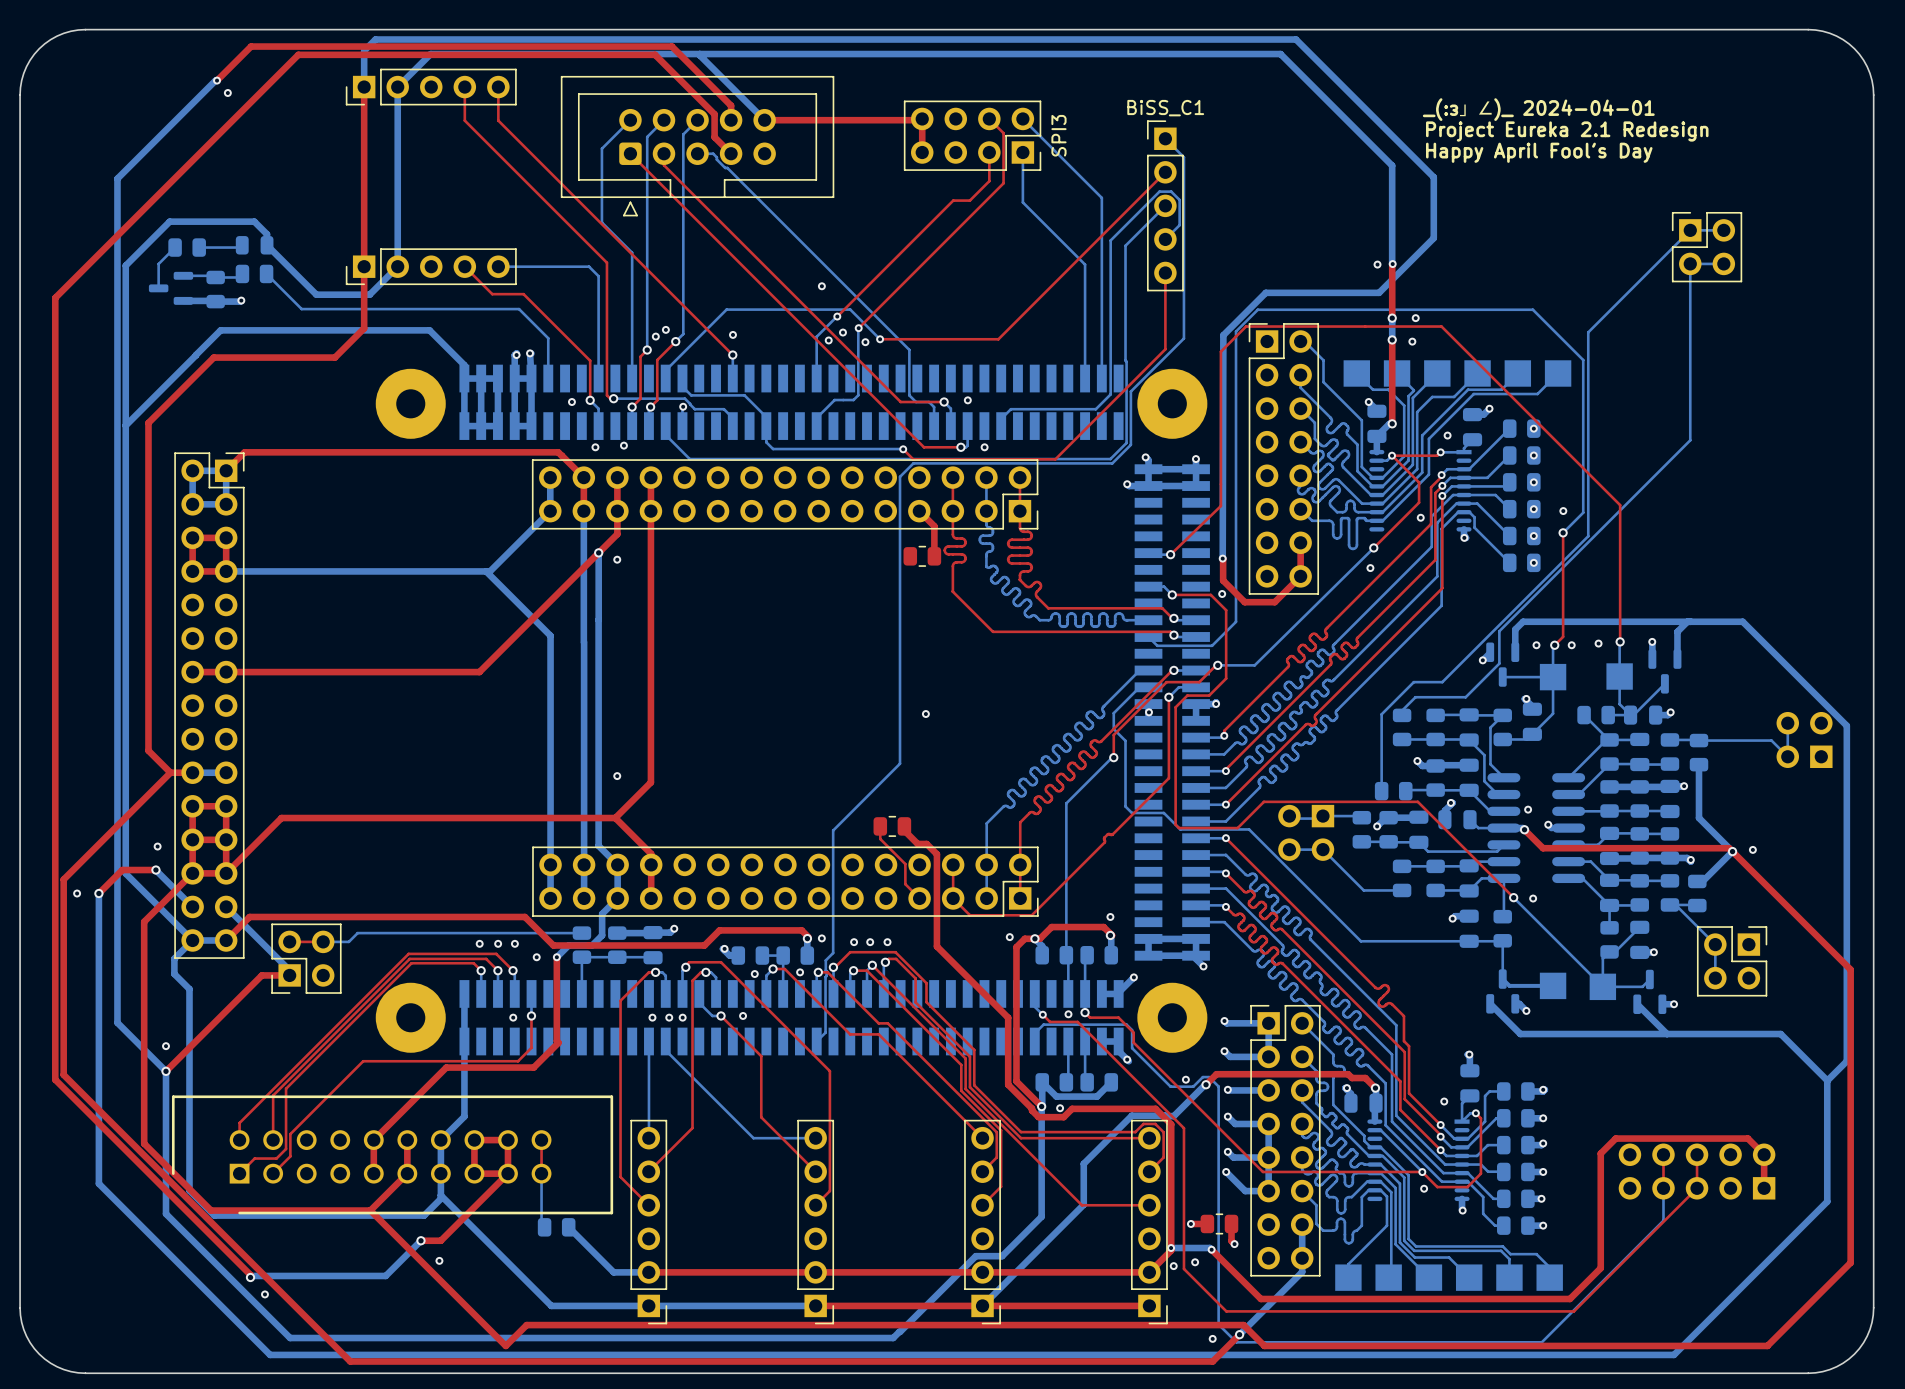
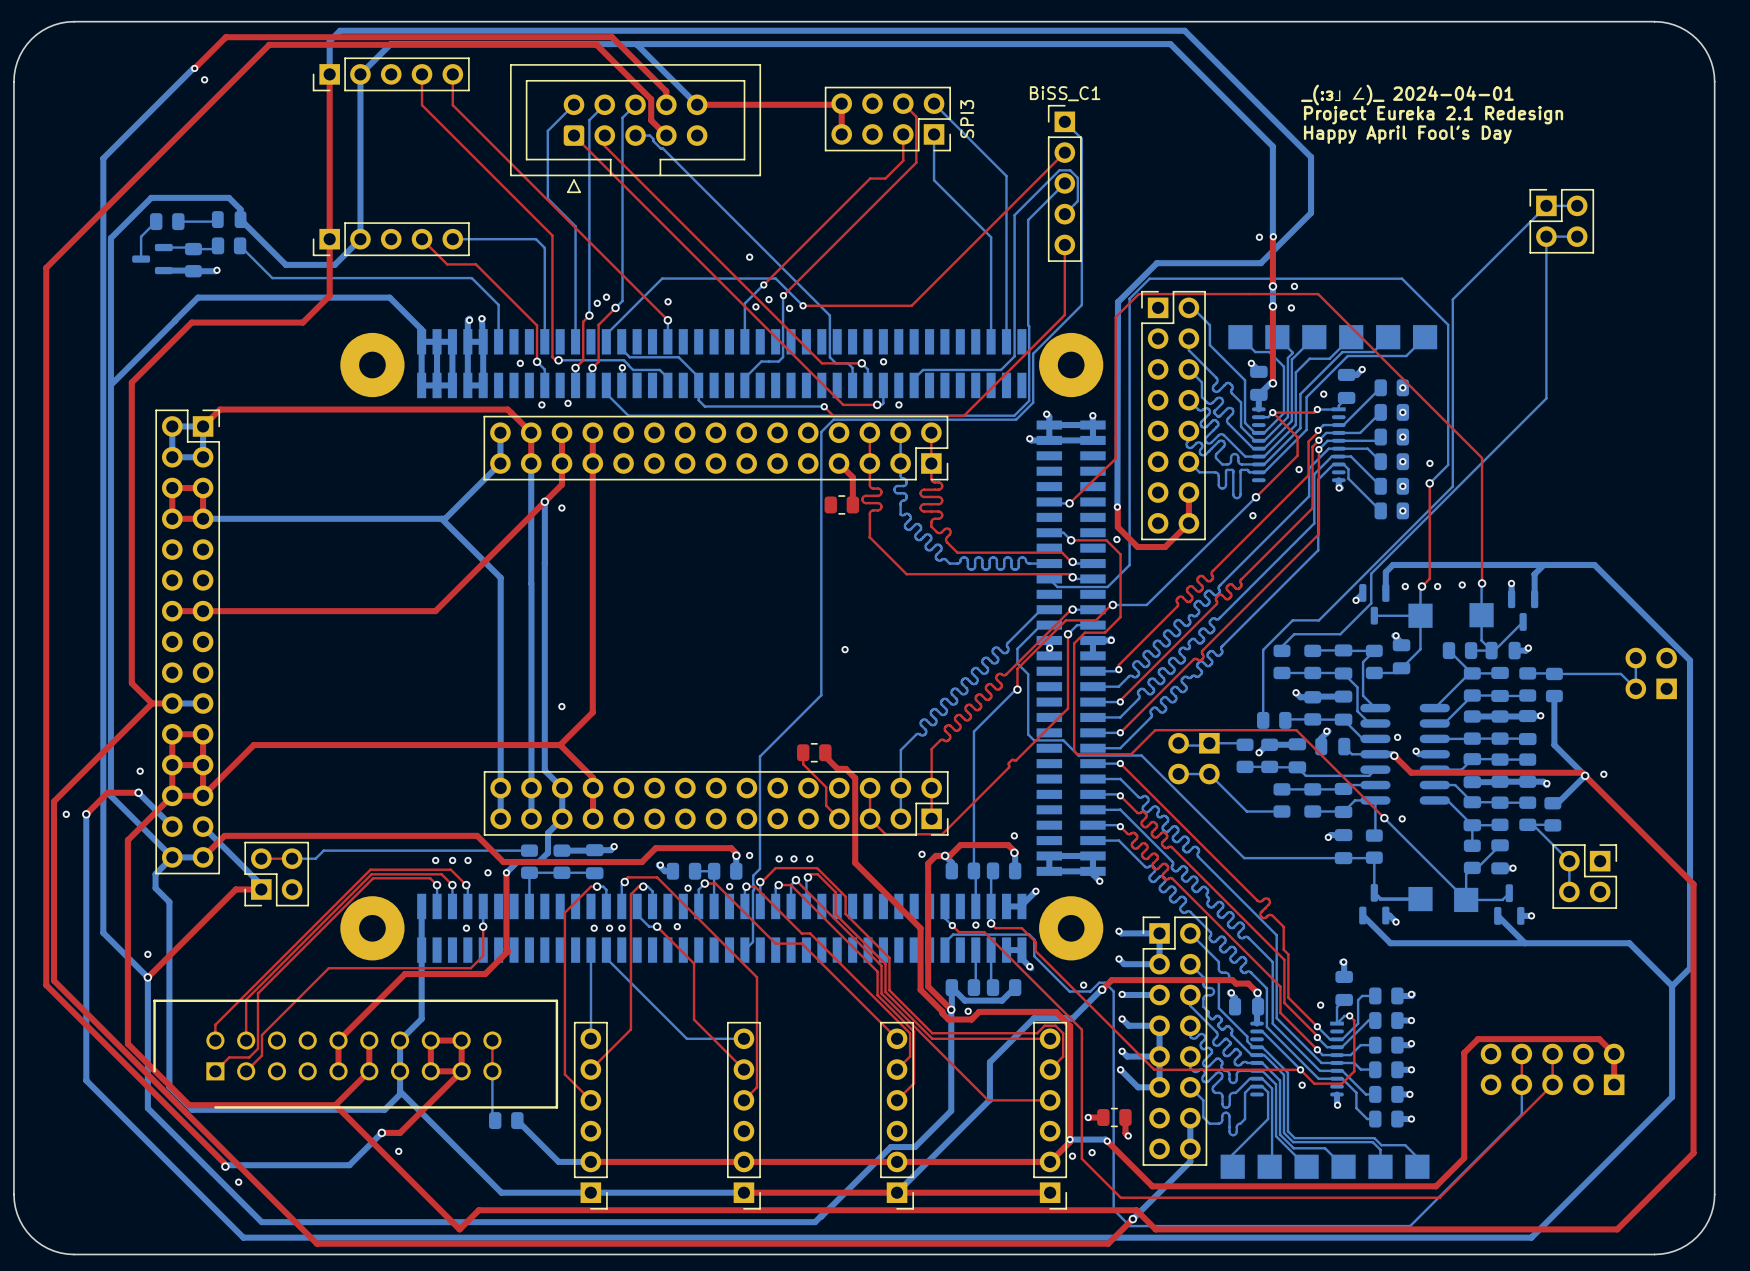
via: (1212, 1338) -> none

